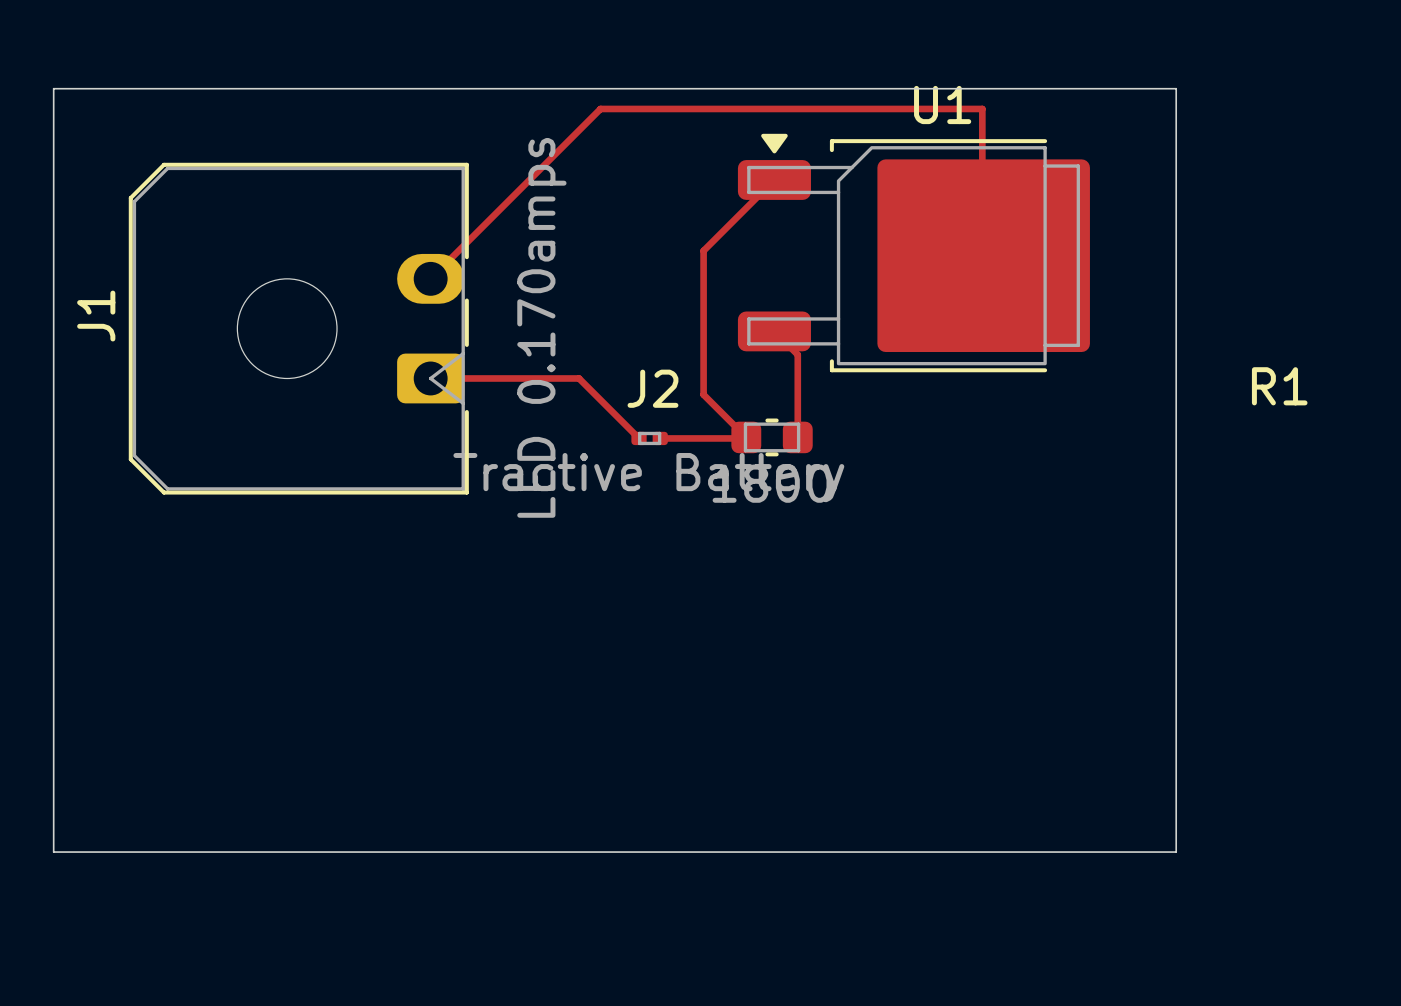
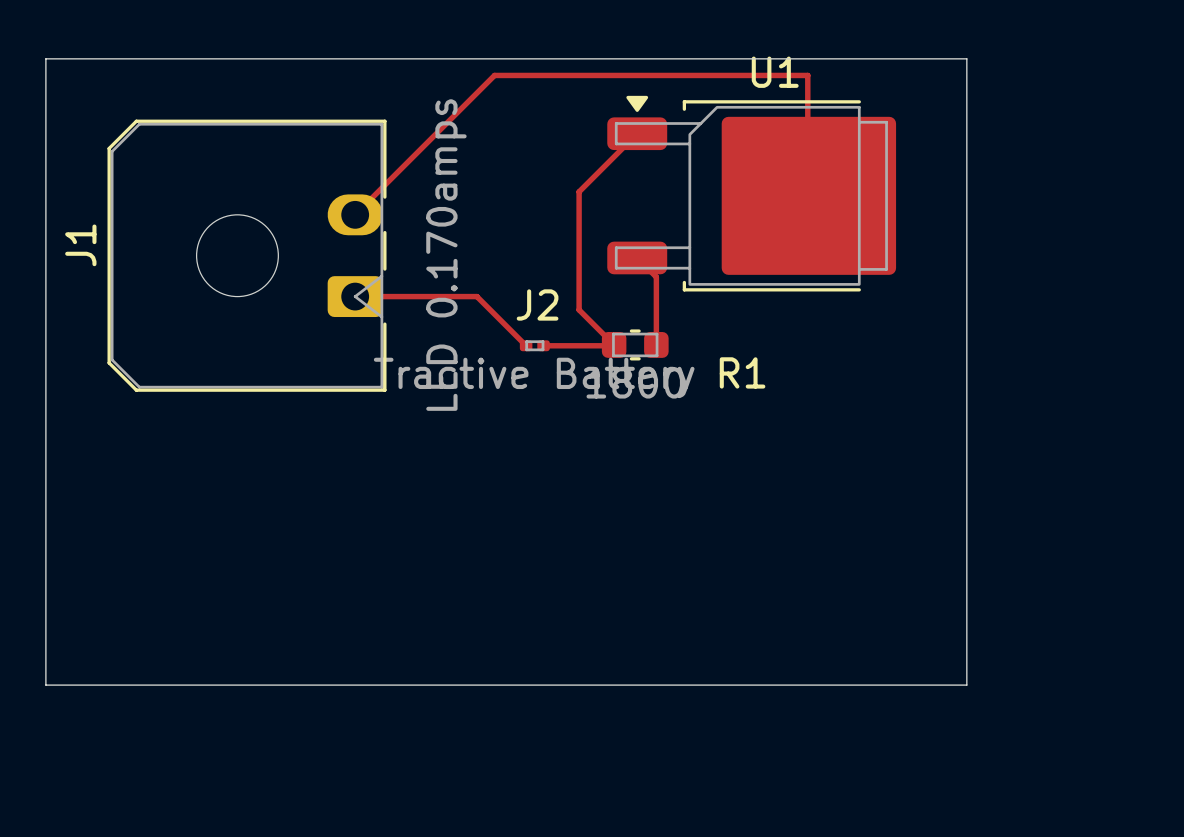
R1 name position: R1 (1279, 386) -> R1 (742, 372)

